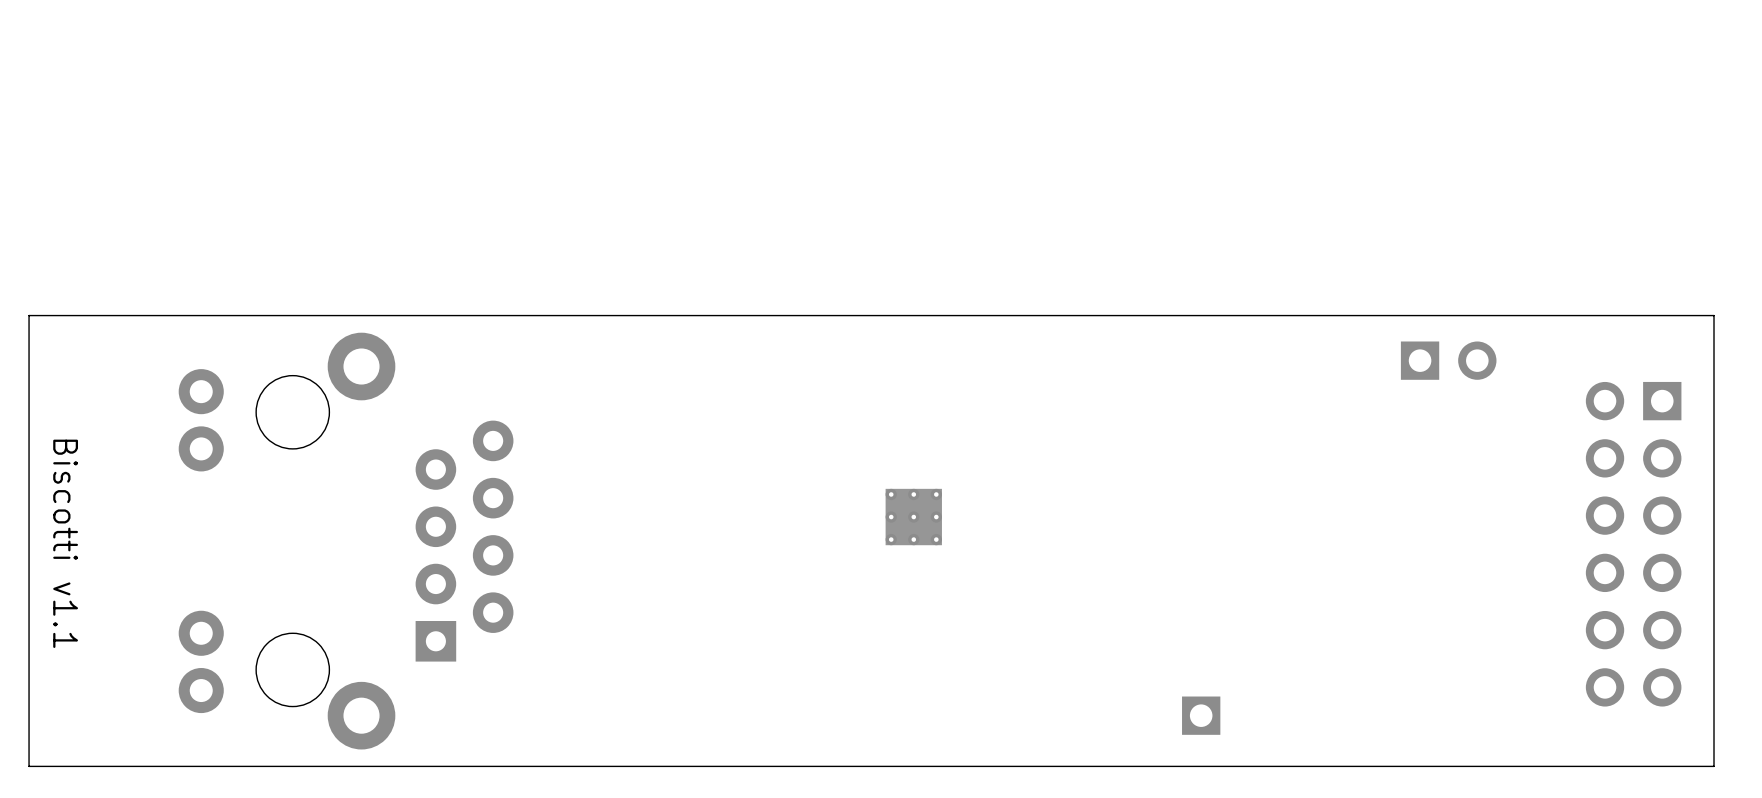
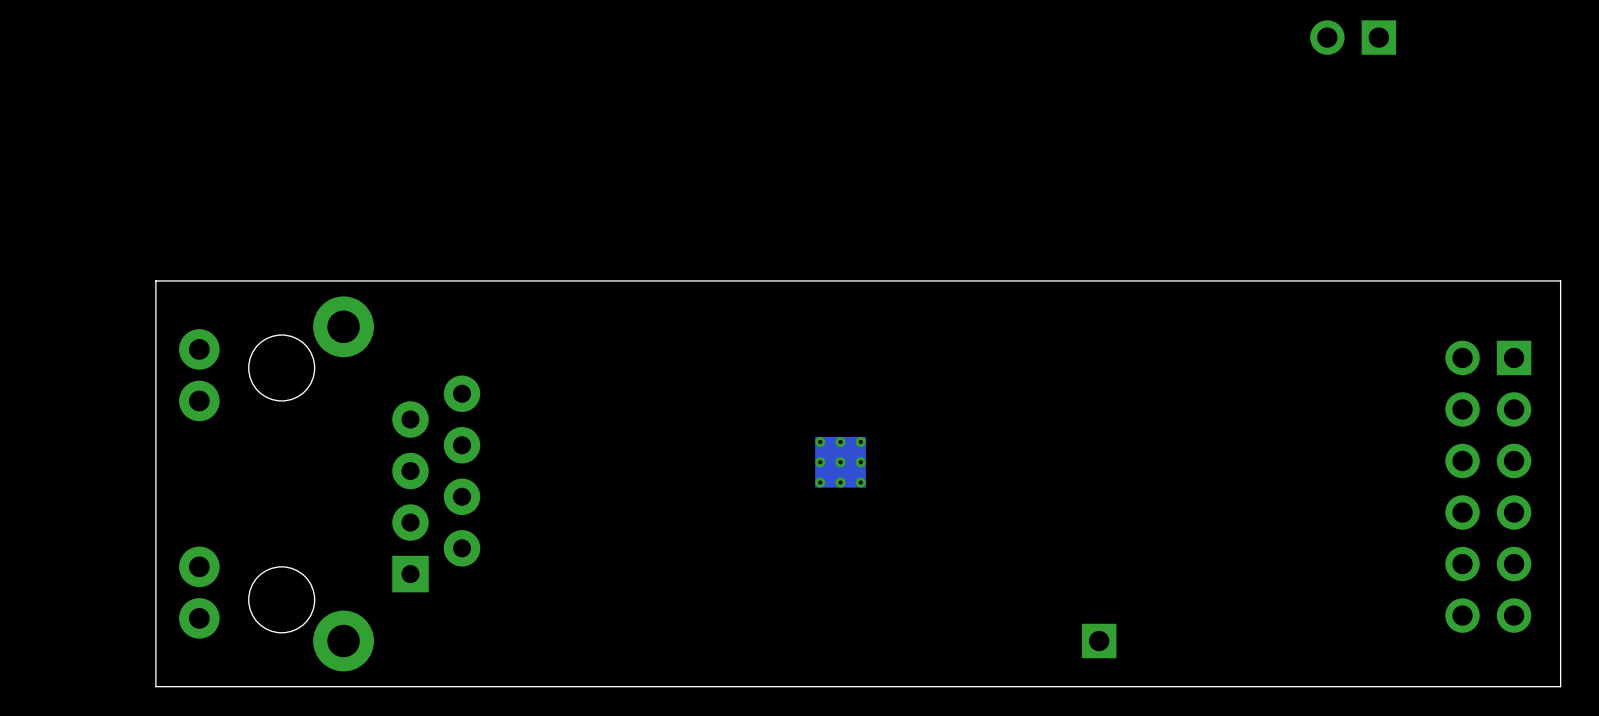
board edge: (153, 315) (29, 315) (29, 766) (153, 766) -> (155, 280) (155, 686)
part rotation: 0° (1448, 360) -> 180° (1353, 37)
part position: (1448, 360) -> (1353, 37)
text: Biscotti v1.1 (65, 543) -> none

